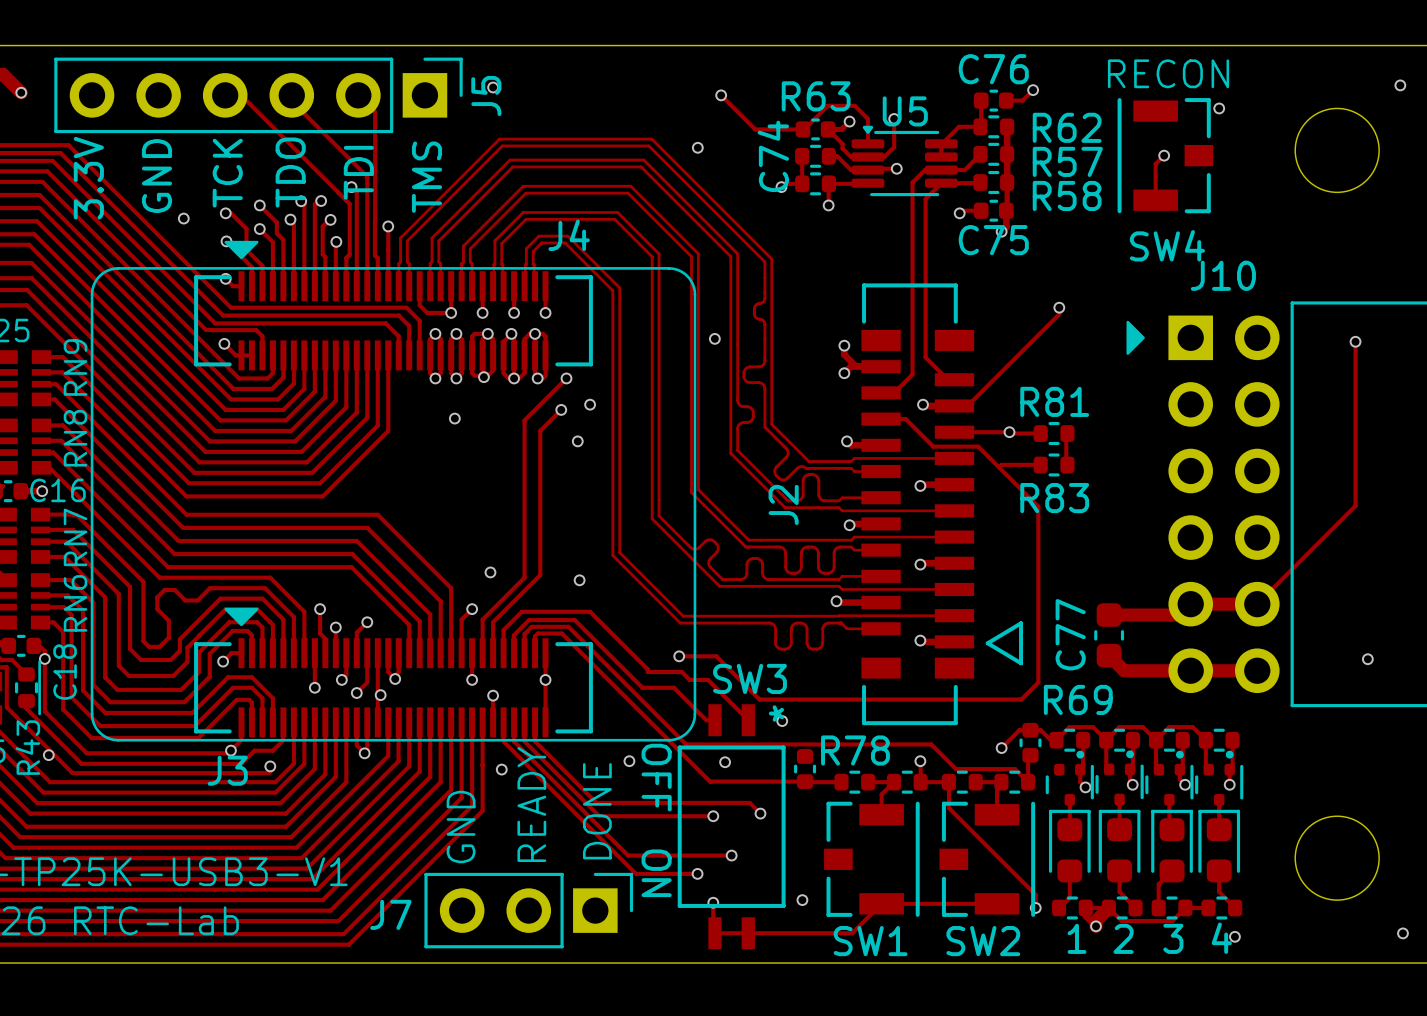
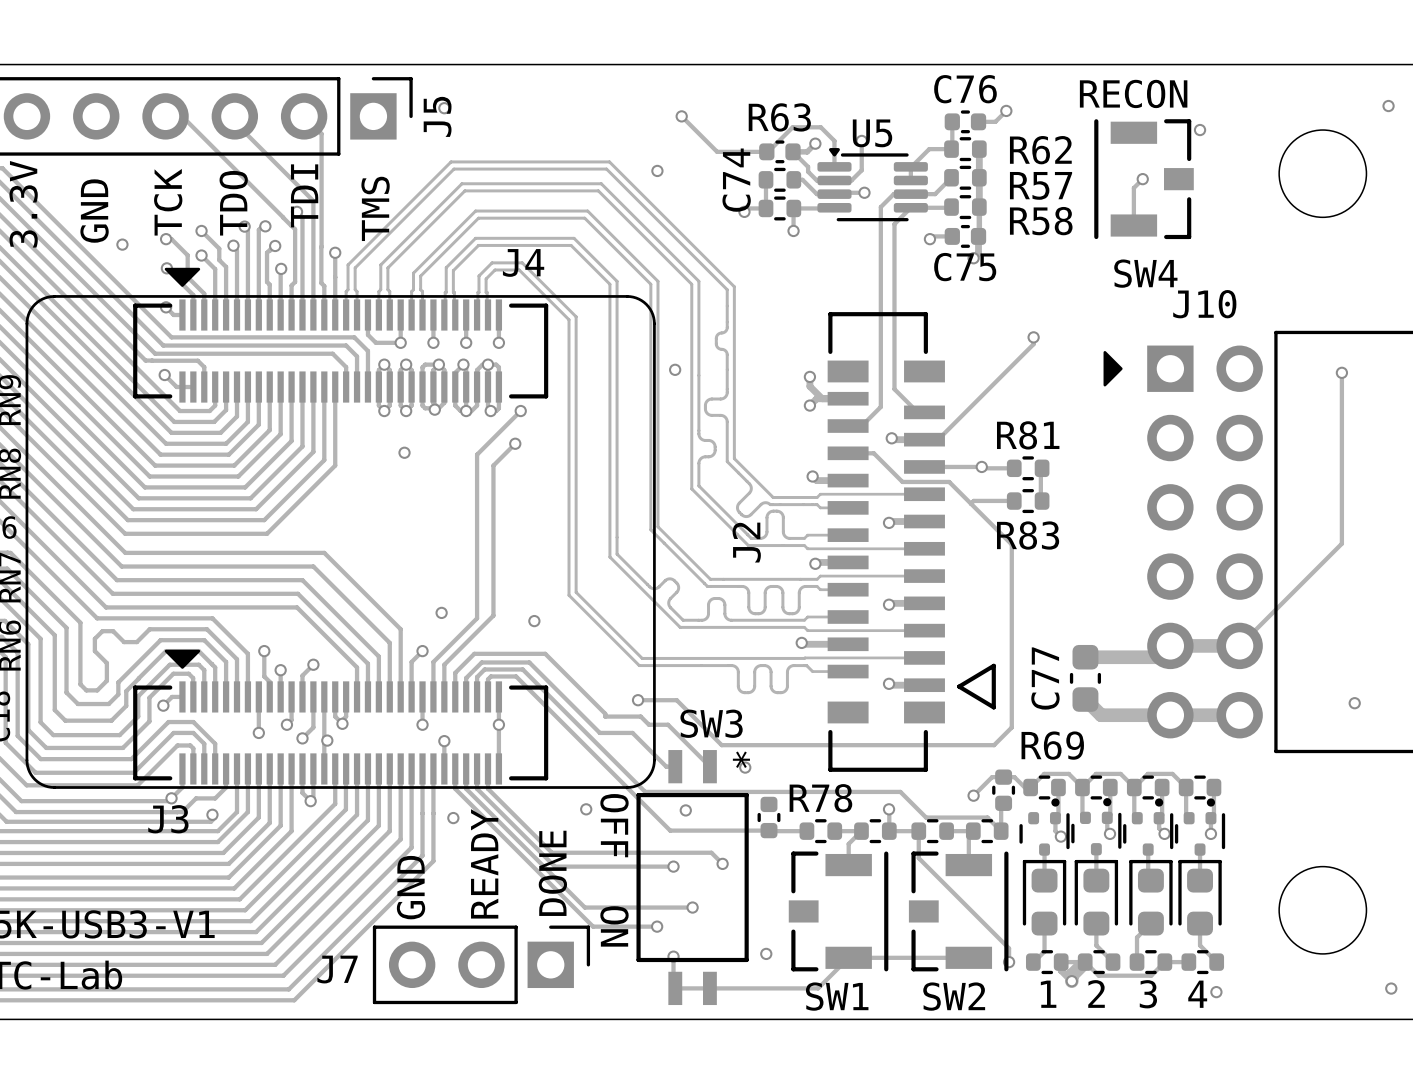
via: (590, 404) -> none
via: (577, 441) -> none

